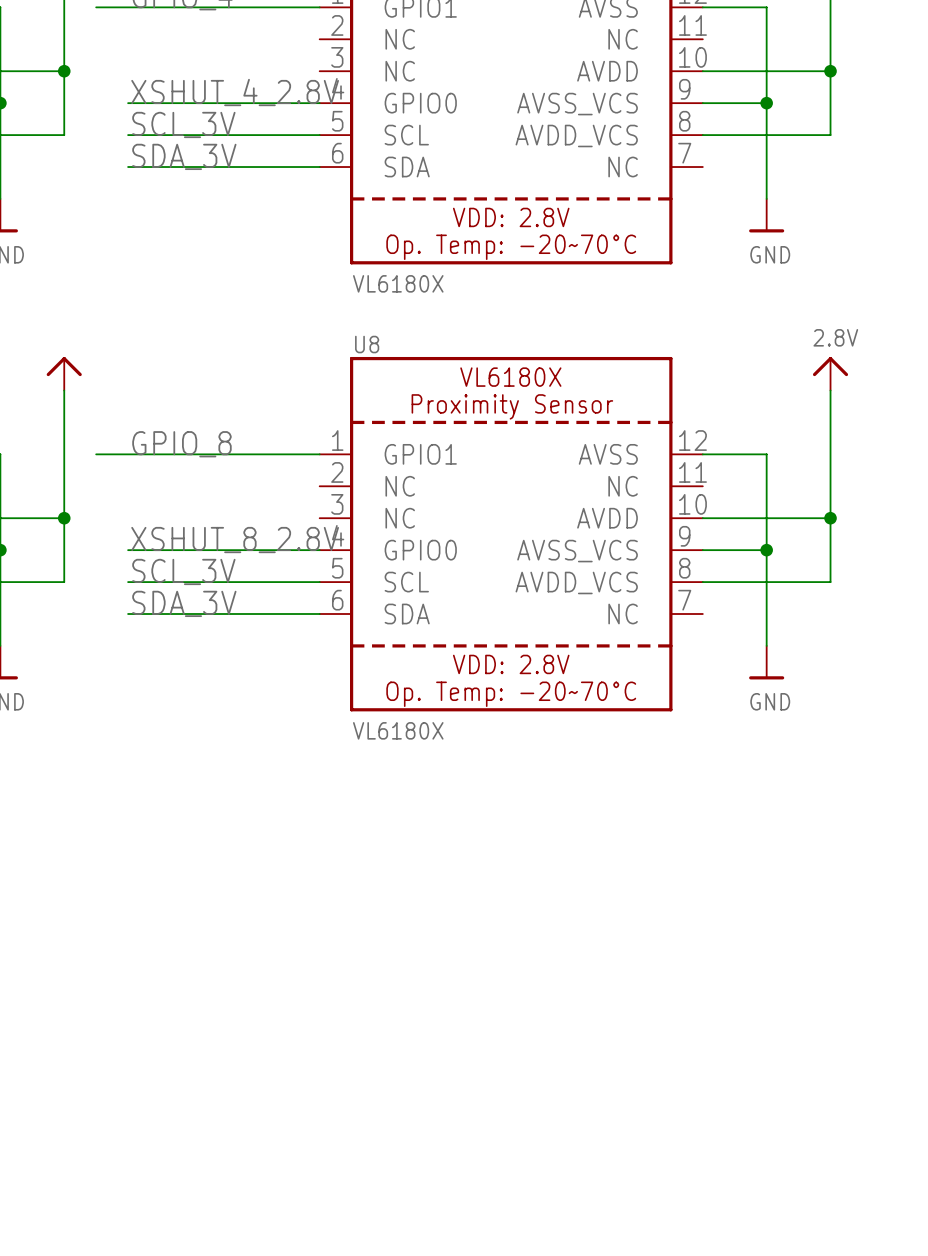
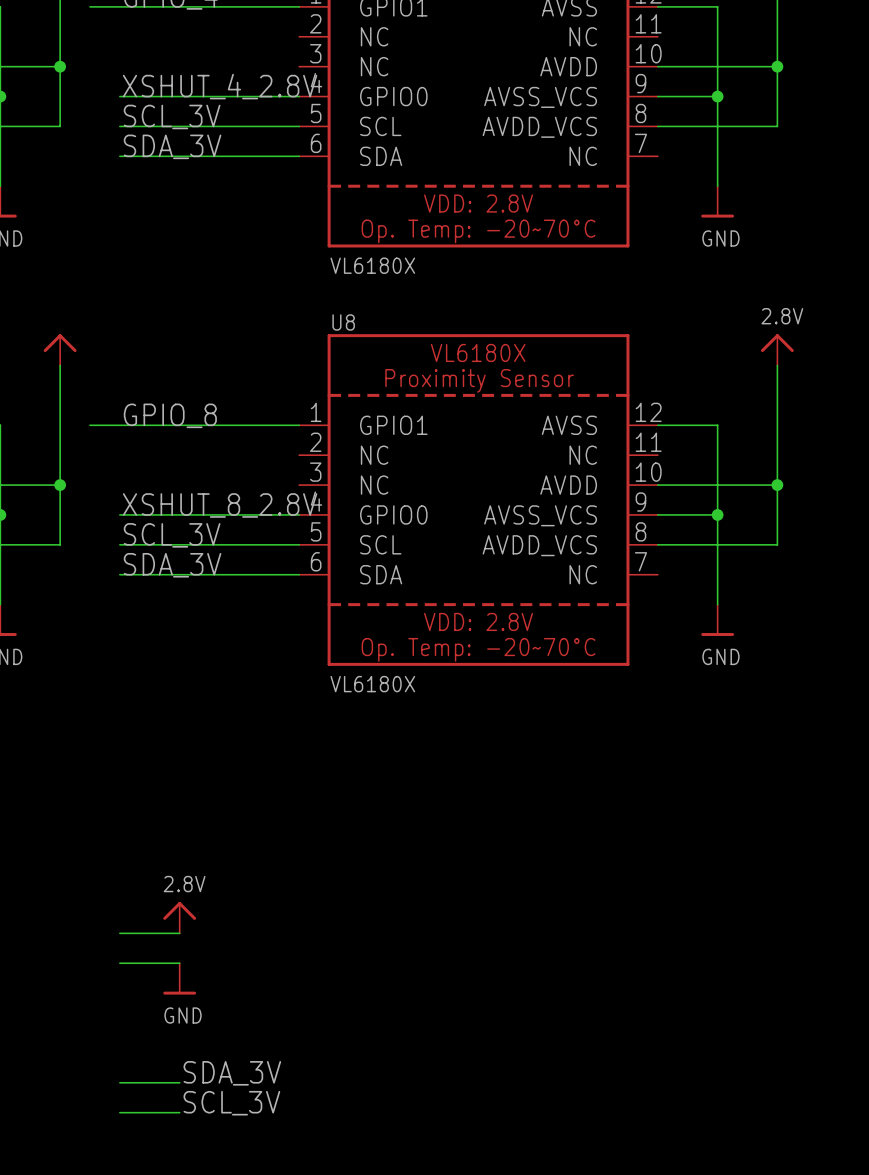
power symbol: none -> 2.8V (179, 917)
wire: none -> (119, 933) (179, 933)
wire: none -> (119, 963) (179, 963)
power symbol: none -> GND (179, 978)
label: none -> SDA_3V (232, 1073)
wire: none -> (119, 1082) (179, 1082)
label: none -> SCL_3V (231, 1103)
wire: none -> (119, 1112) (179, 1112)

